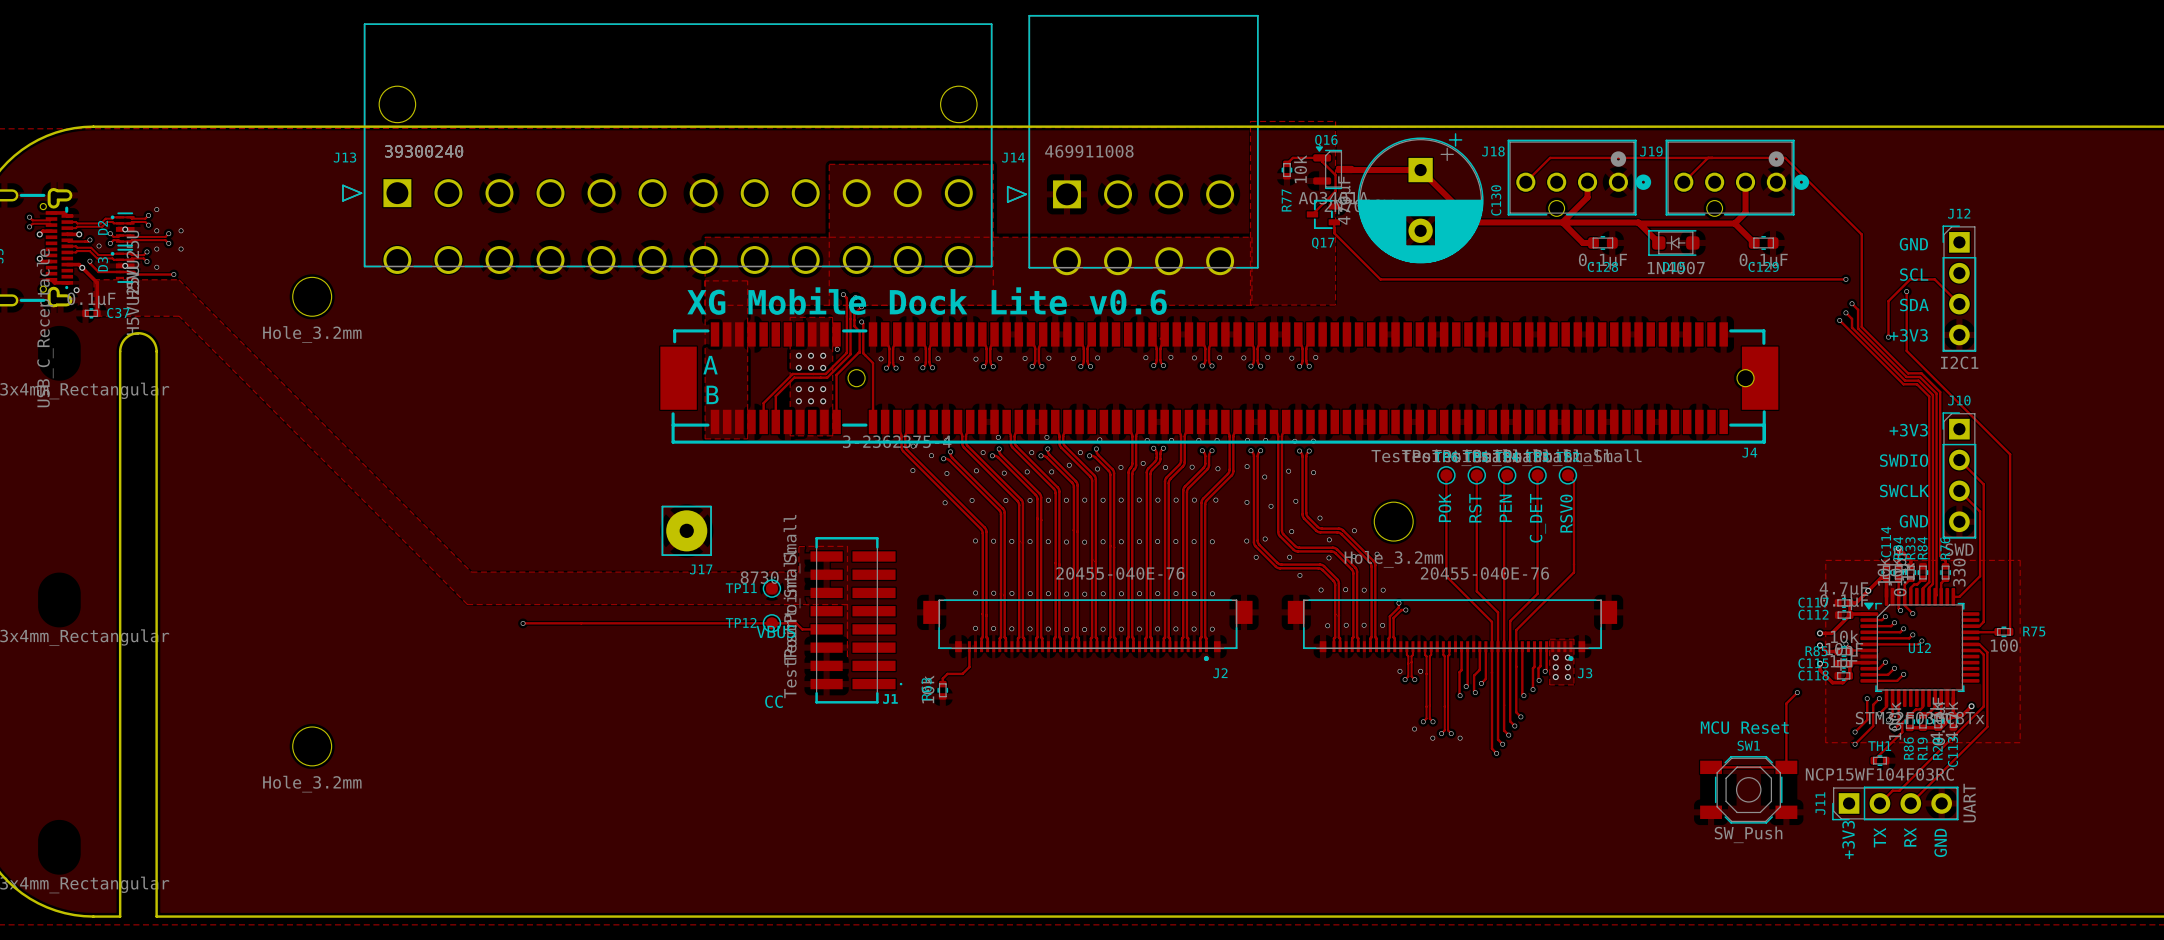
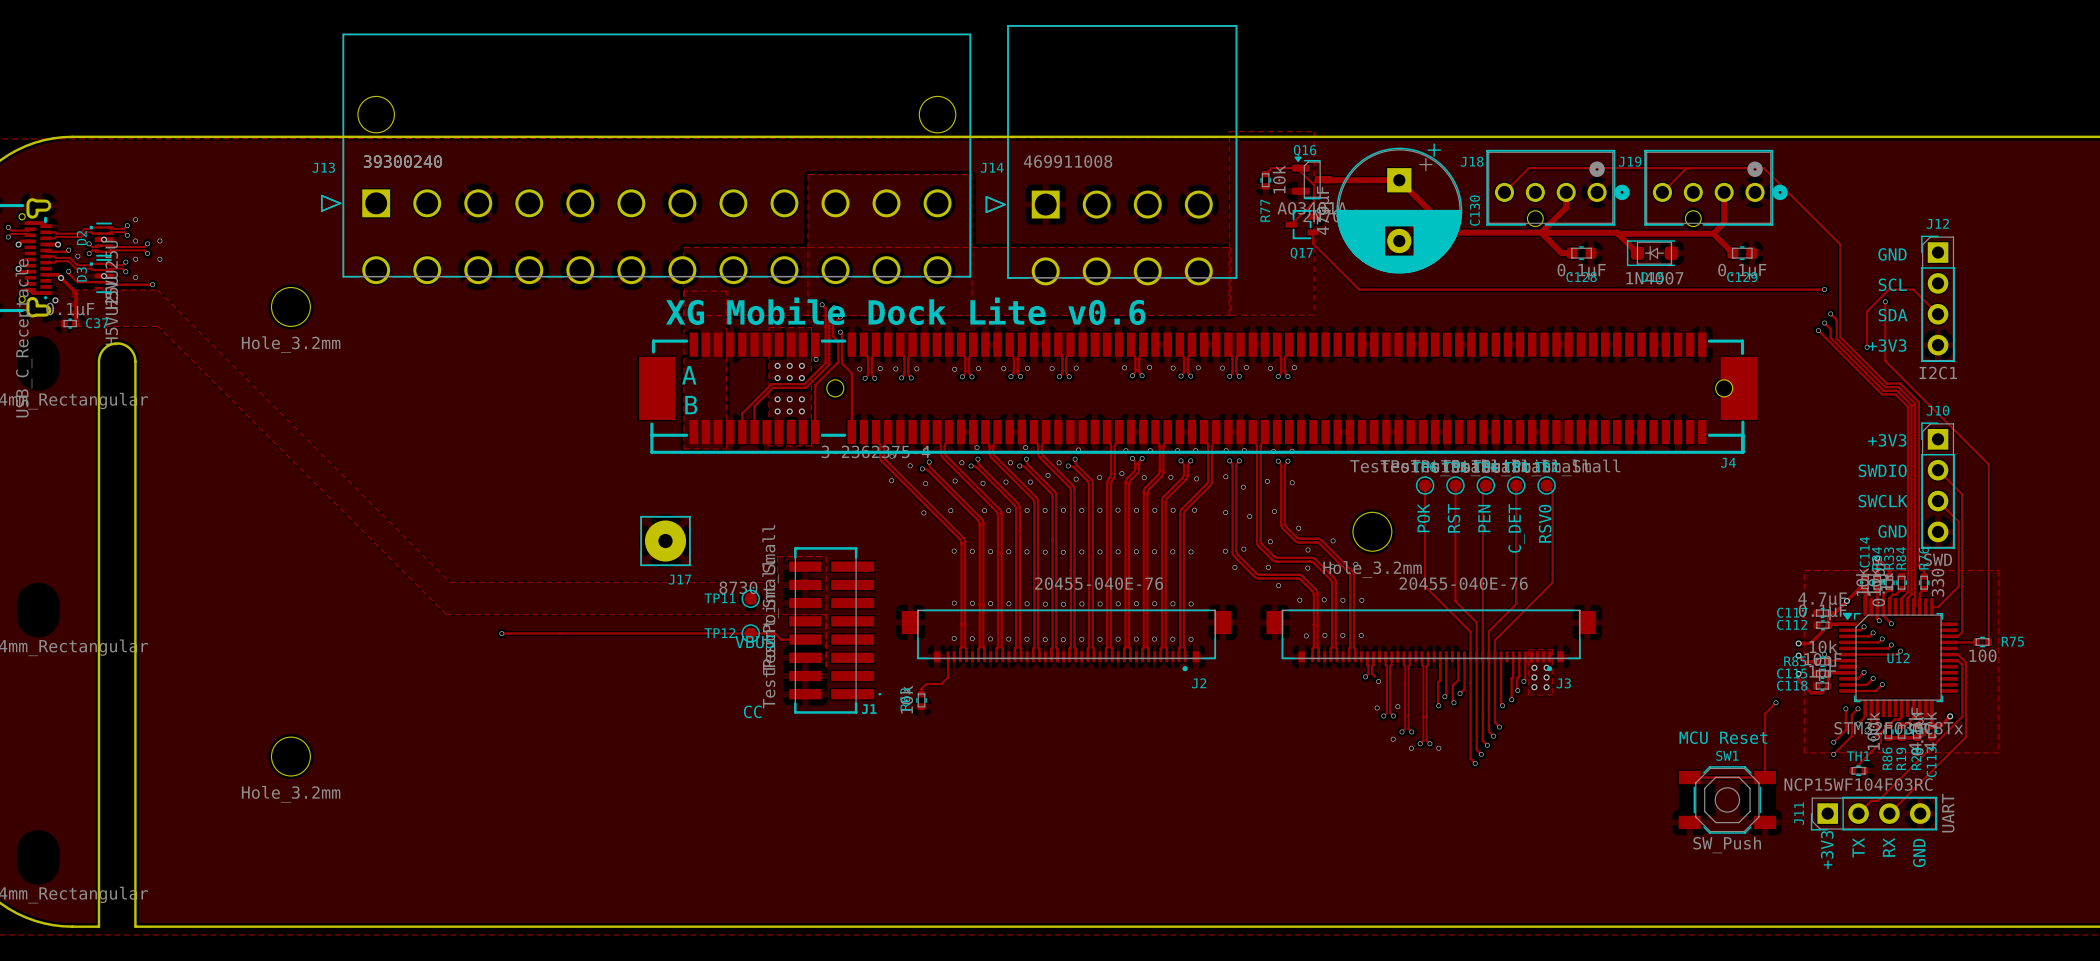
track: (1398, 603) (1398, 607) (1389, 616) (1388, 646) -> (1365, 676) (1368, 673) (1367, 656)
via: (1398, 603) -> none
track: (1405, 610) (1401, 610) (1393, 617) (1394, 646) -> (1375, 676) (1372, 673) (1373, 656)
via: (1405, 610) -> none
via: none -> (1365, 676)
via: (1420, 671) -> none
track: (1408, 676) (1405, 679) -> (1386, 686) (1386, 712) (1383, 715)
track: (1411, 676) (1414, 679) -> (1390, 686) (1390, 712) (1393, 715)
via: (1405, 679) -> none
via: (1414, 679) -> none
via: none -> (1397, 706)
via: none -> (1377, 707)
via: none -> (1383, 715)
via: none -> (1393, 715)

